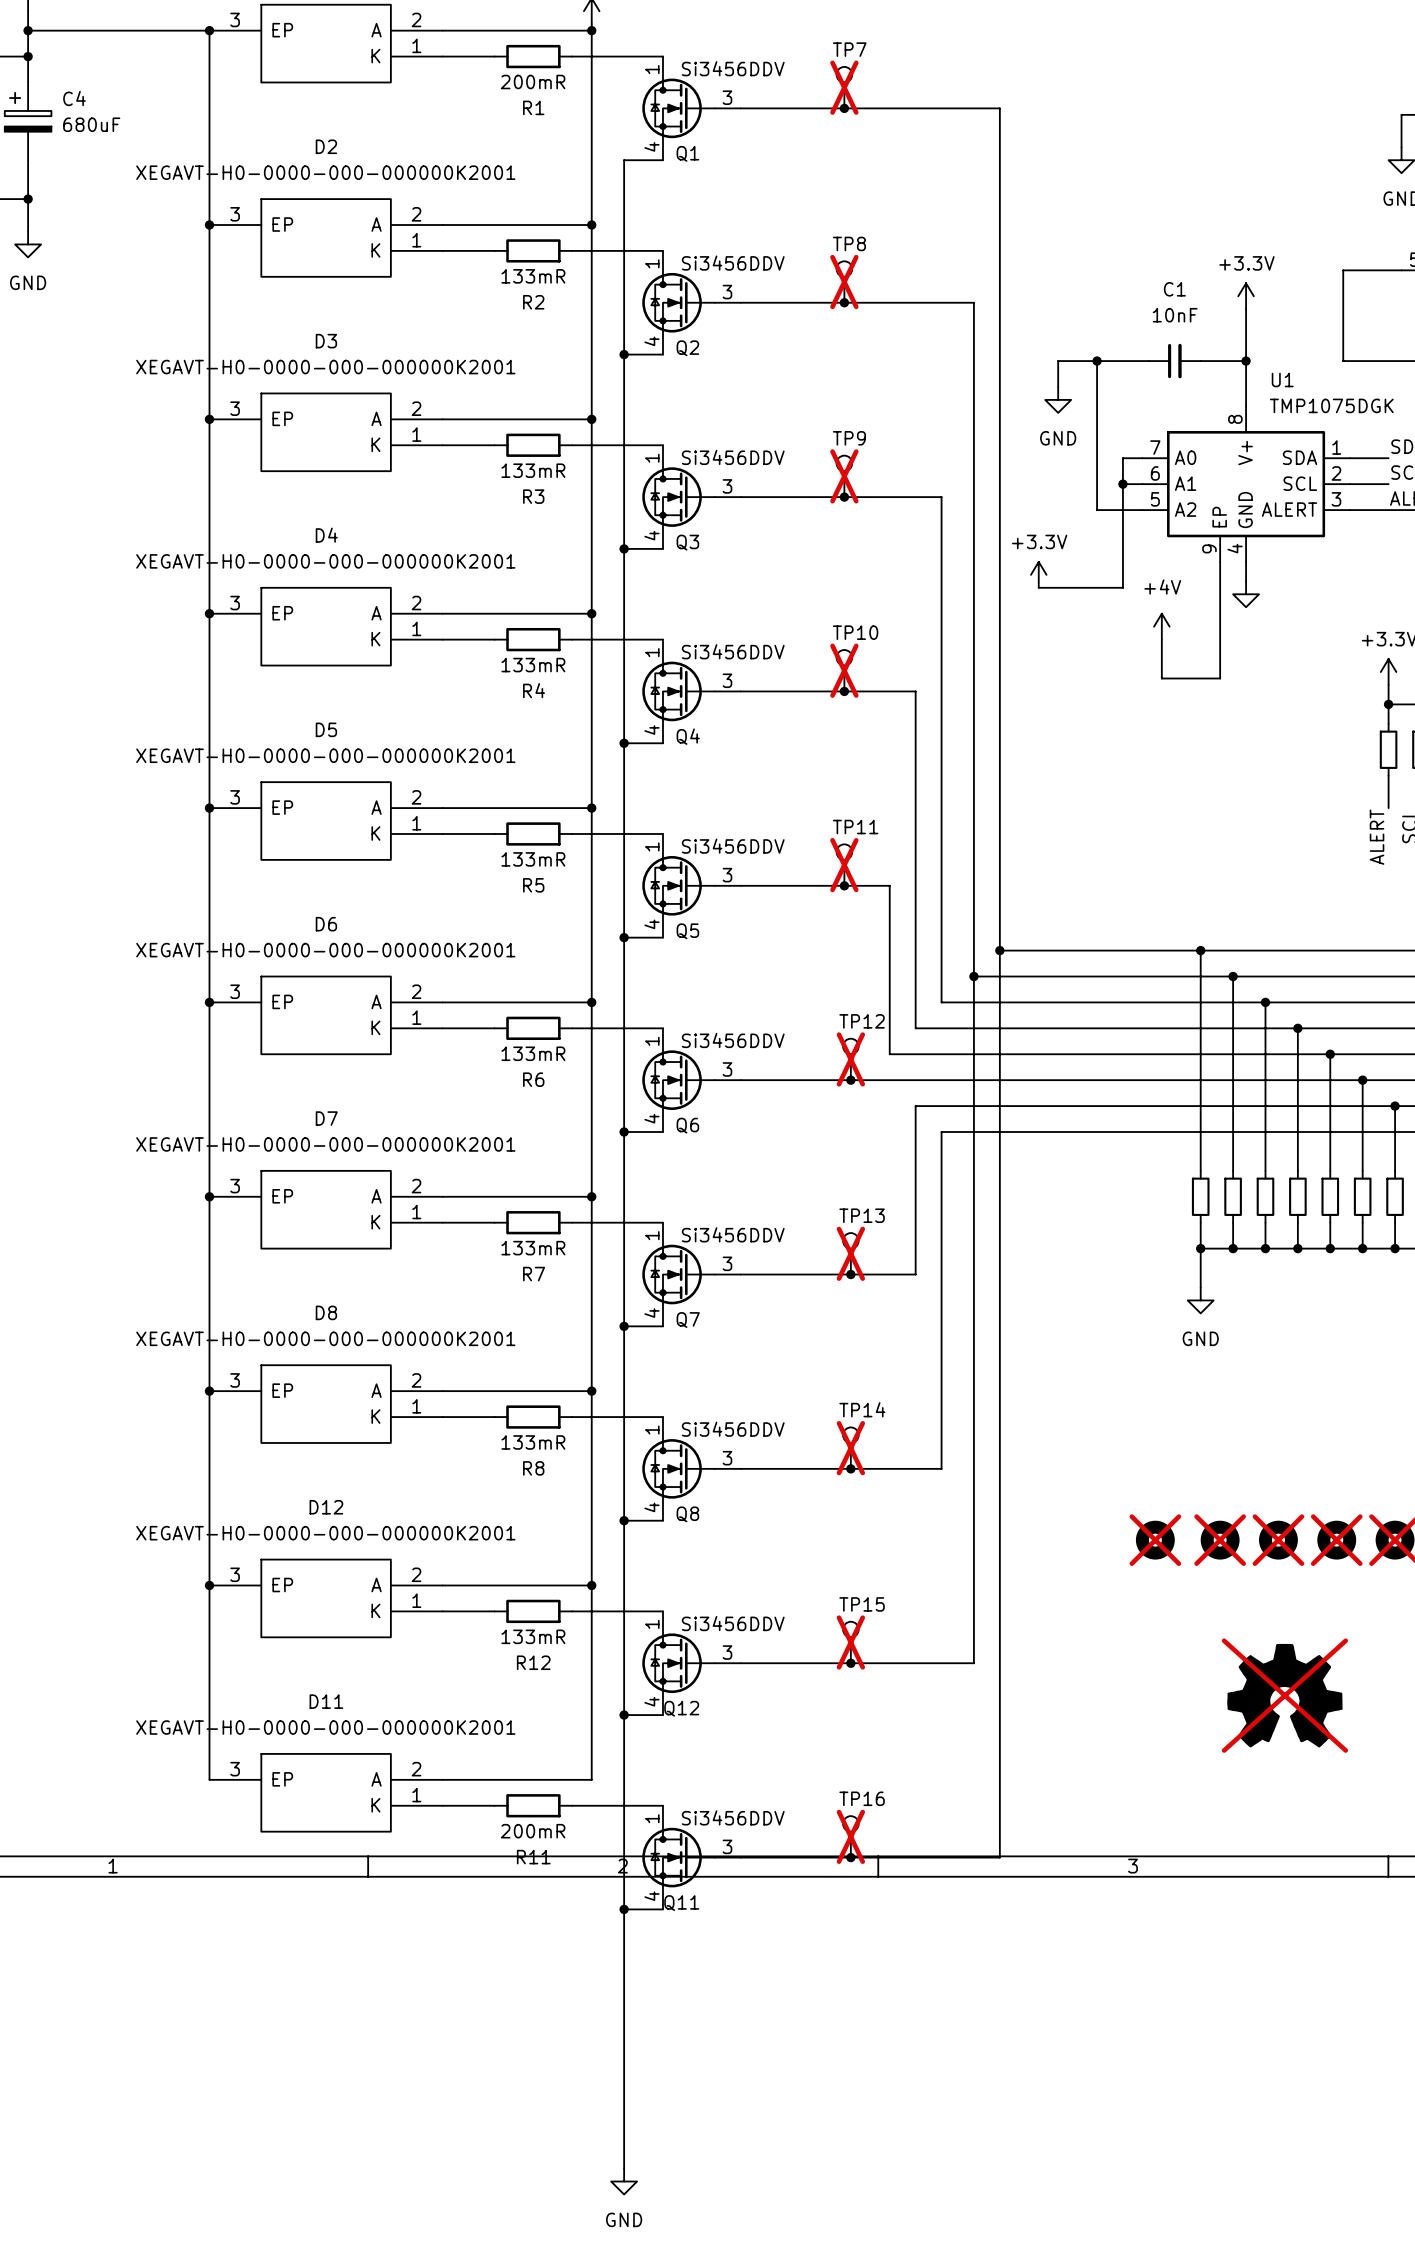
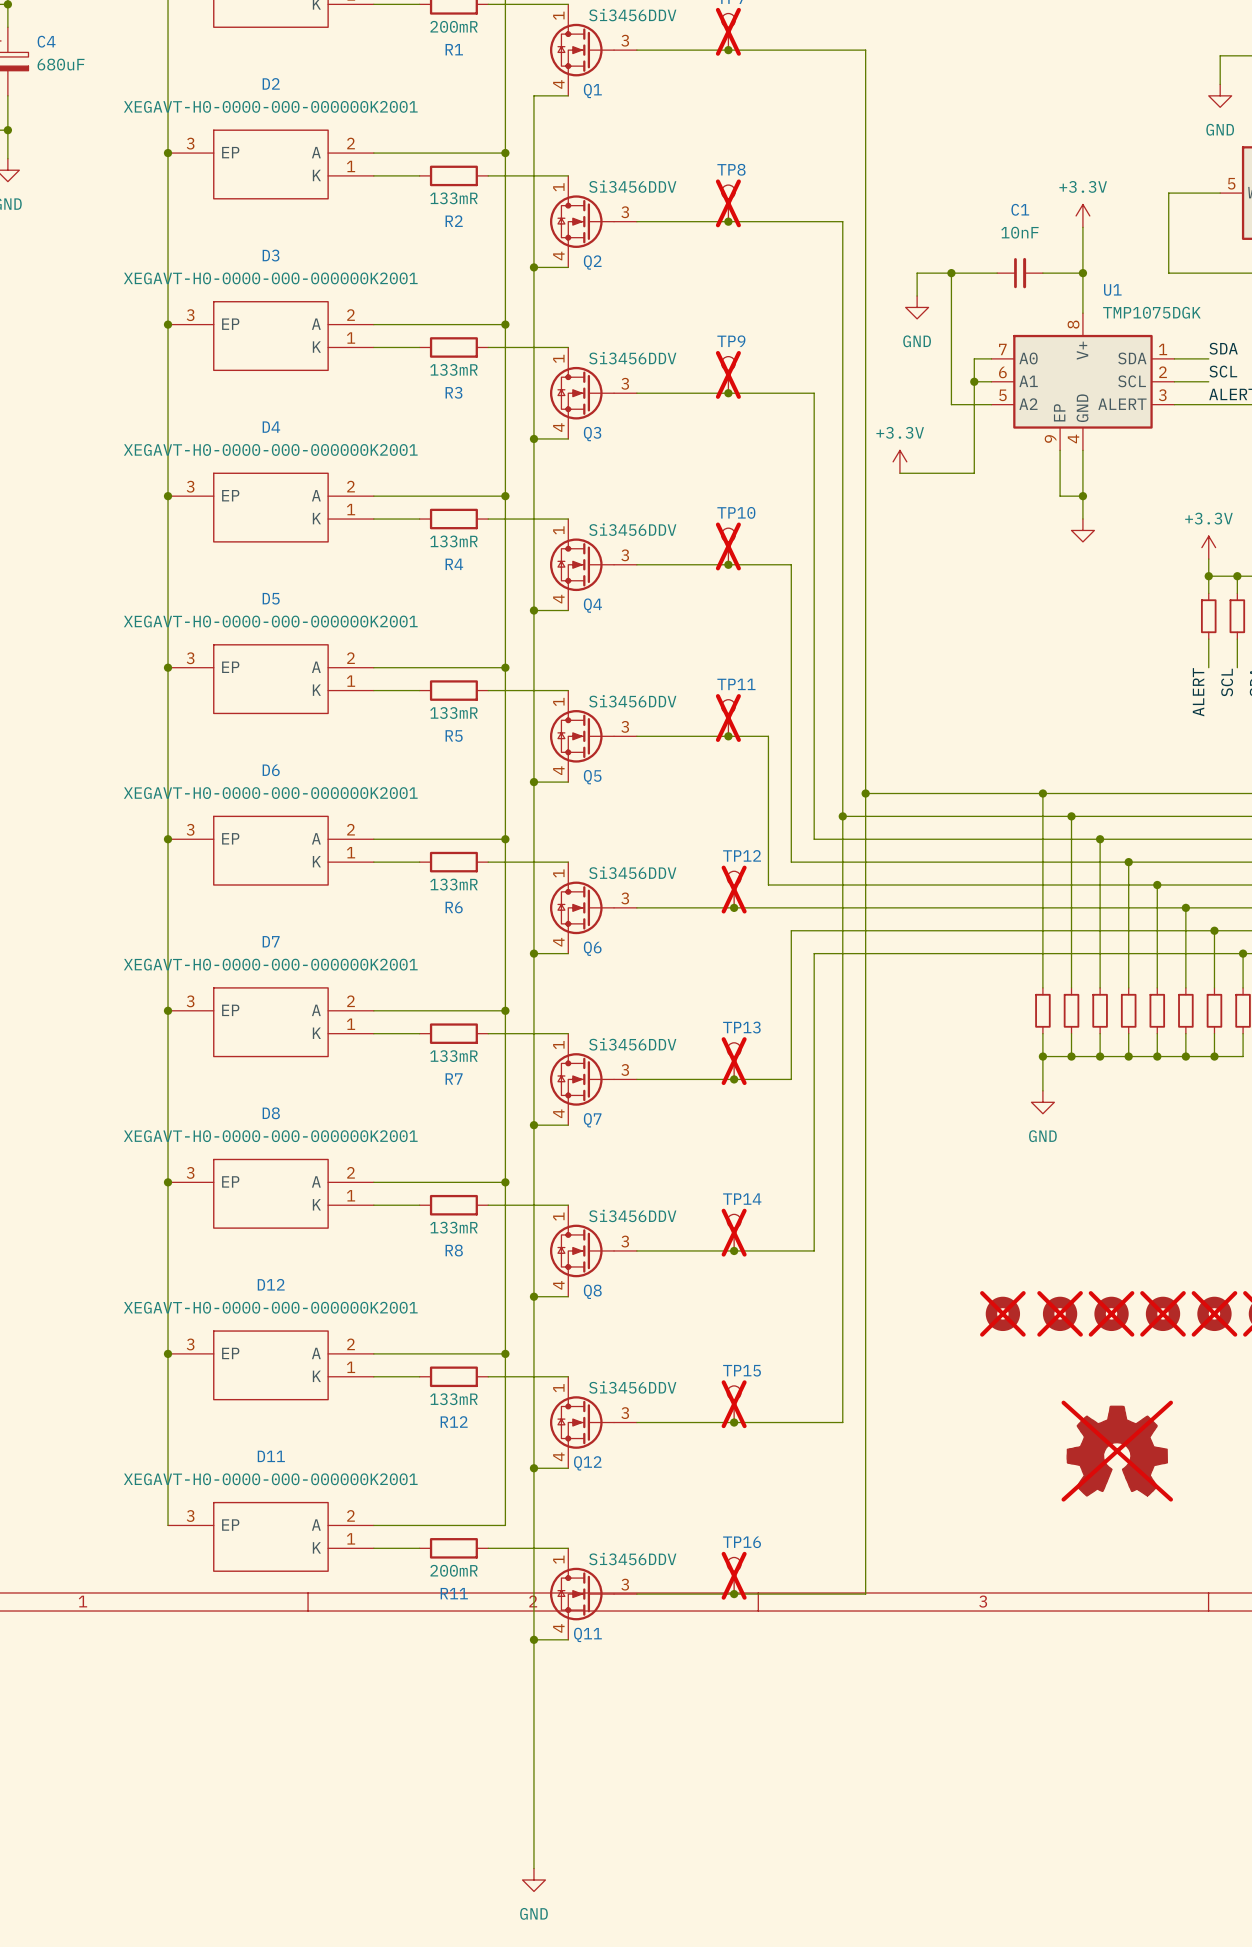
wire: none -> (1082, 467) (1082, 519)
power symbol position: (1246, 594) -> (1082, 530)
wire: (1220, 613) (1220, 678) (1161, 678) (1161, 639) -> (1060, 496) (1082, 496)
junction: none -> (1082, 496)
power symbol: +4V (1161, 626) -> none

